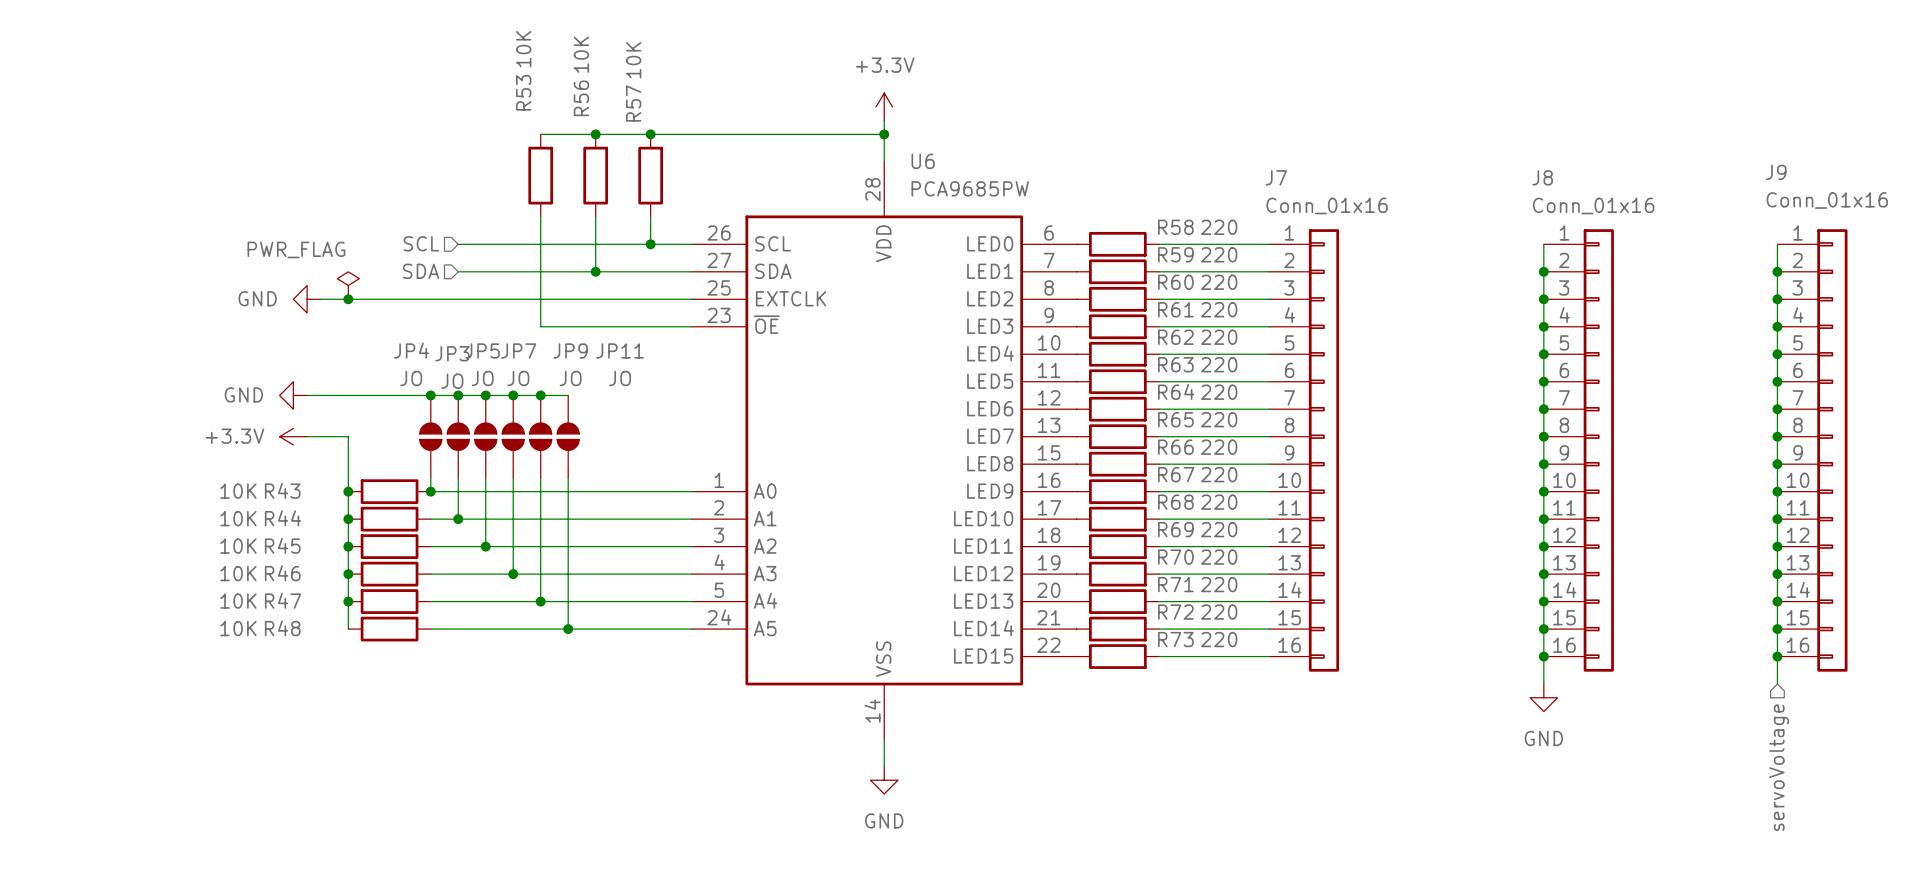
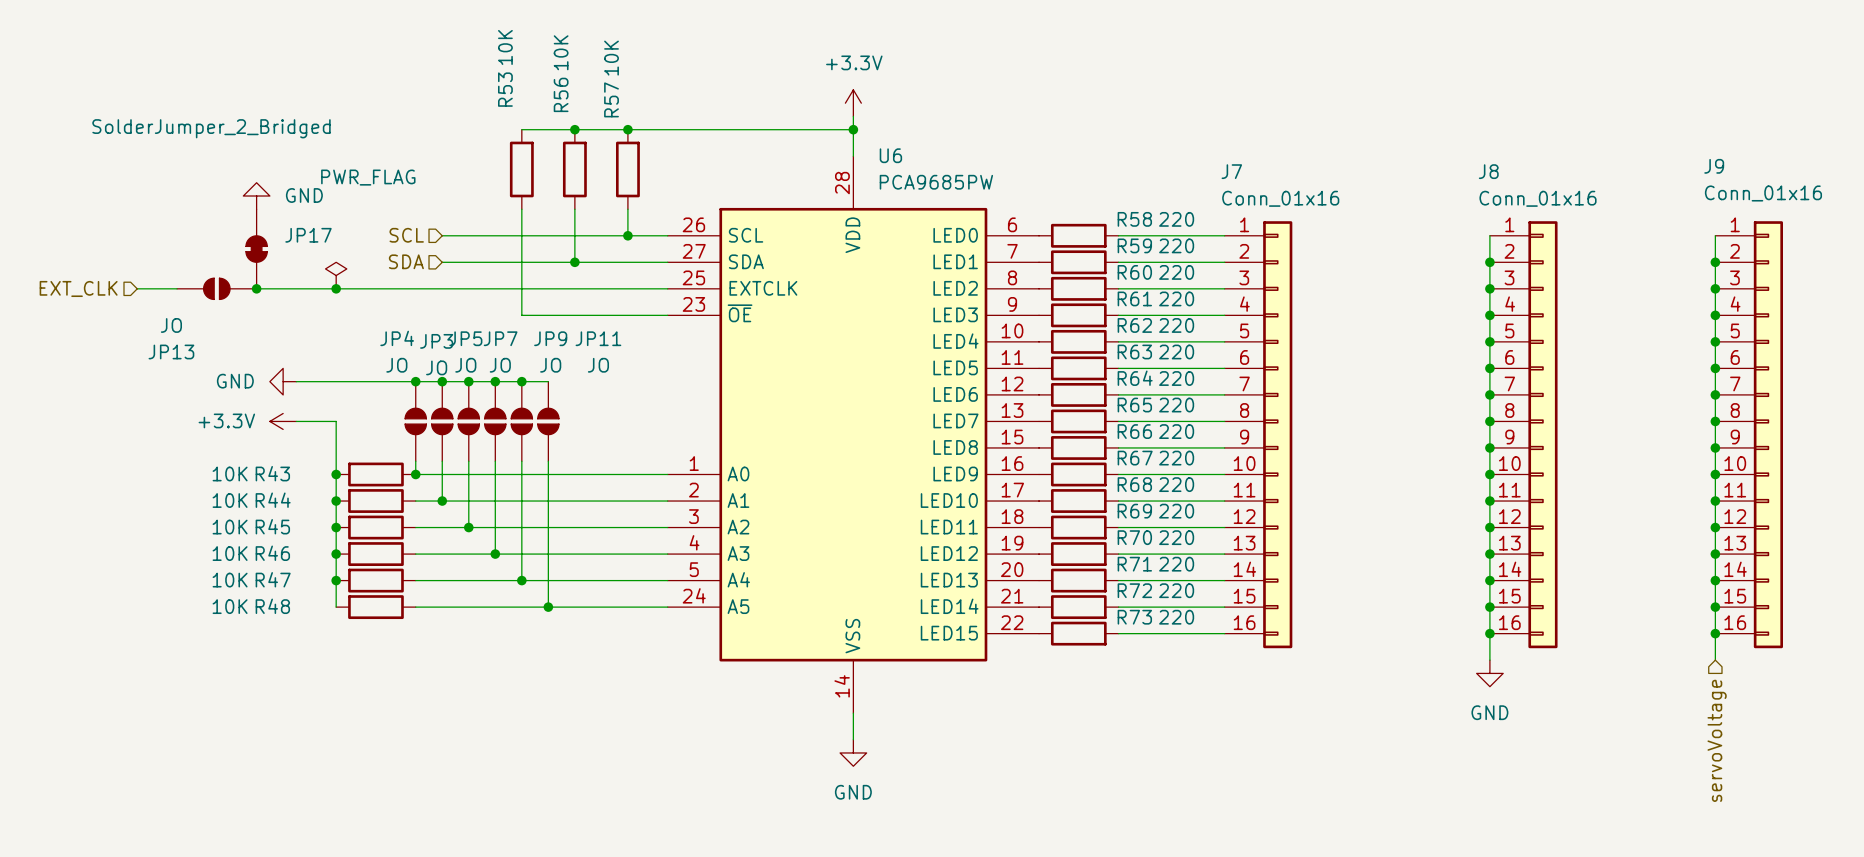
power symbol text position: PWR_FLAG (296, 249) -> PWR_FLAG (368, 177)
JP17: none -> SolderJumper_2_Bridged (256, 249)
power symbol text position: GND (257, 298) -> GND (304, 195)
hierarchical label: none -> EXT_CLK (78, 288)
wire: none -> (137, 288) (177, 288)
JP13: none -> JO (216, 288)
wire: none -> (256, 288) (309, 288)
junction: none -> (256, 288)
power symbol rotation: 0° (307, 299) -> 90° clockwise (256, 196)
power symbol position: GND (307, 299) -> GND (256, 196)

